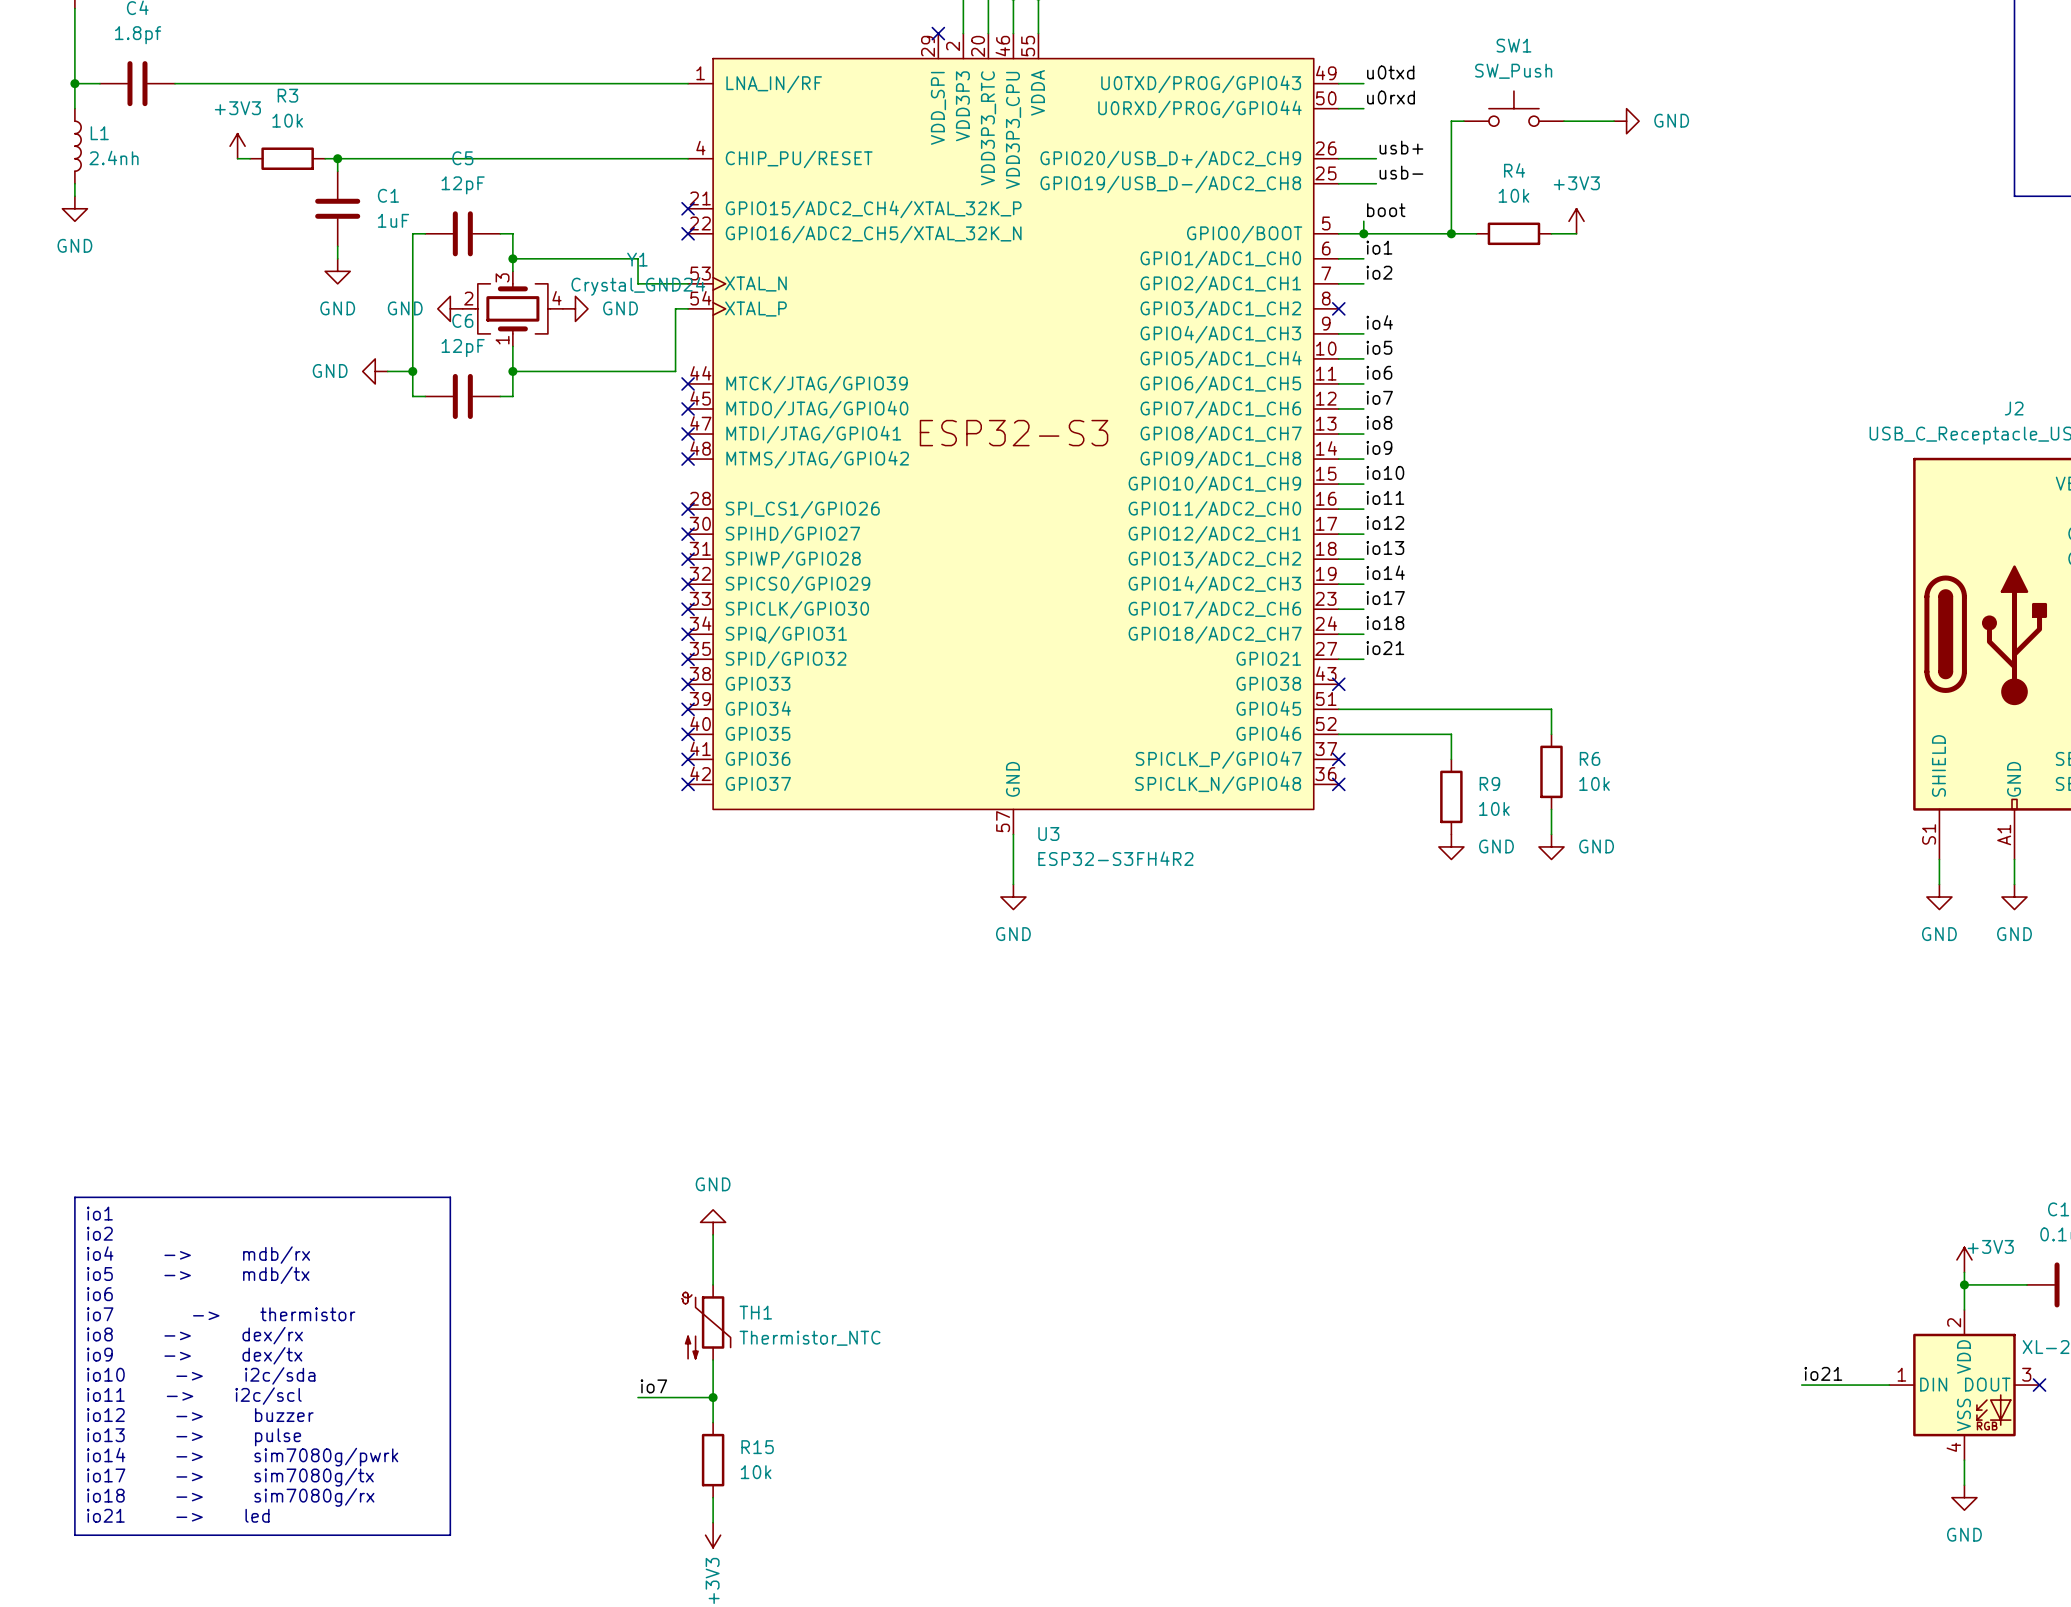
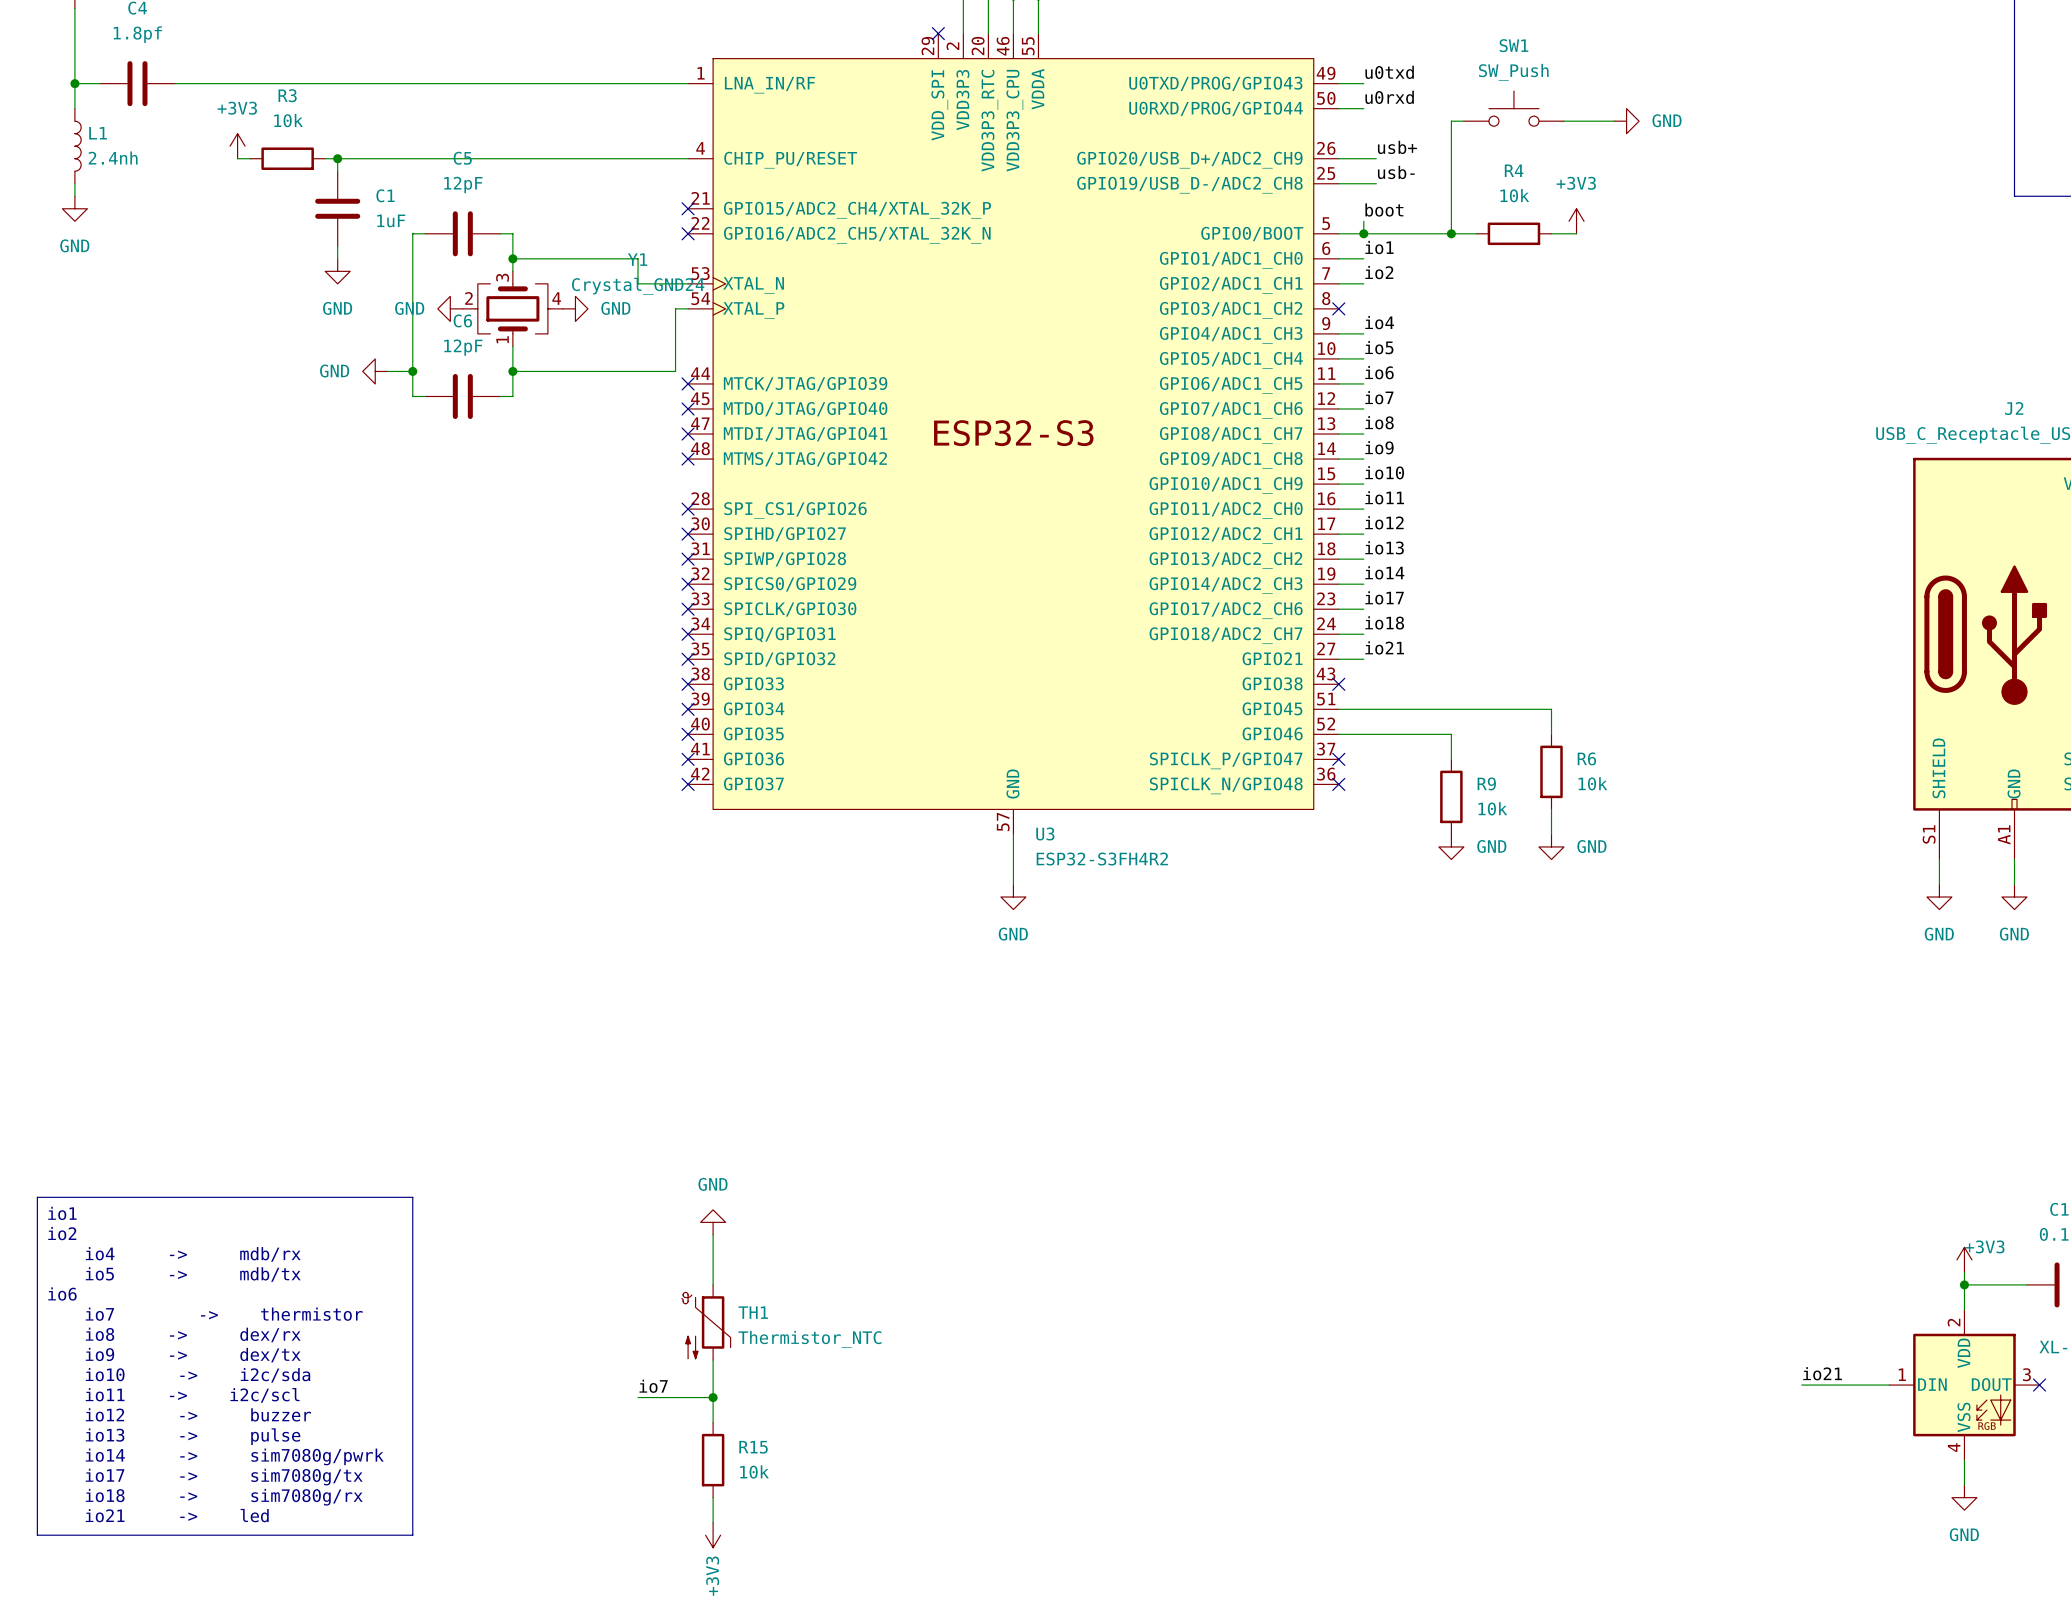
line: (74, 1197) (74, 1535) -> (74, 1197) (37, 1197) (37, 1535) (74, 1535)
line: (412, 1197) (450, 1197) (450, 1535) (412, 1535) -> (412, 1197) (412, 1535)
text position: io1 (99, 1213) -> io1 (62, 1213)
text position: io2 (99, 1233) -> io2 (62, 1233)
text position: io6 (99, 1294) -> io6 (62, 1294)

